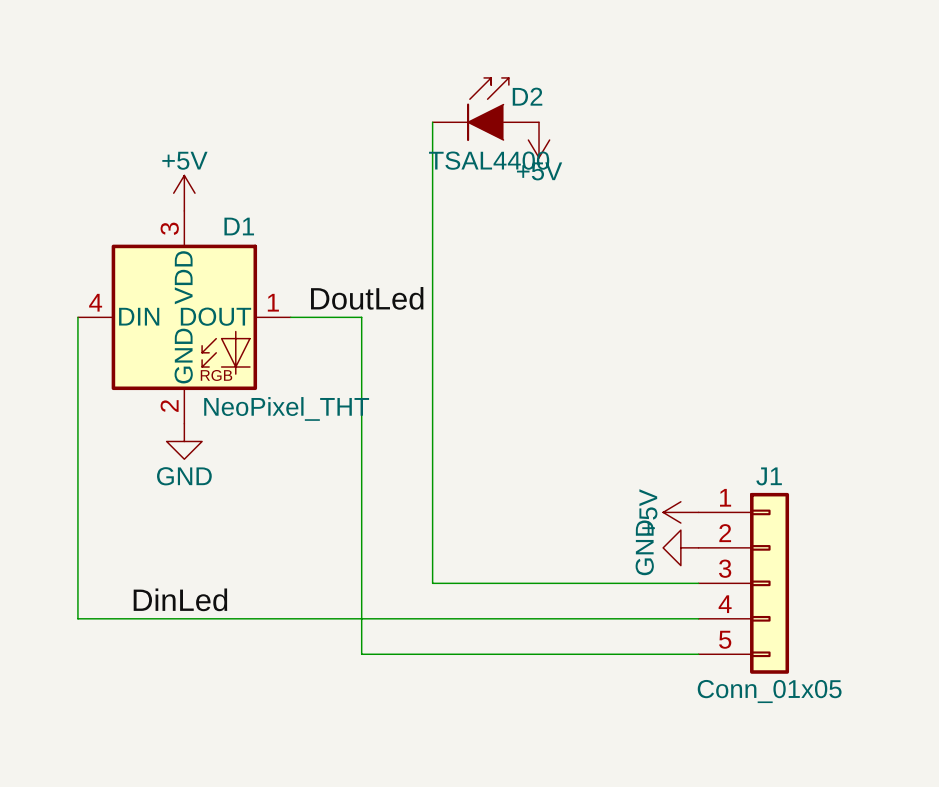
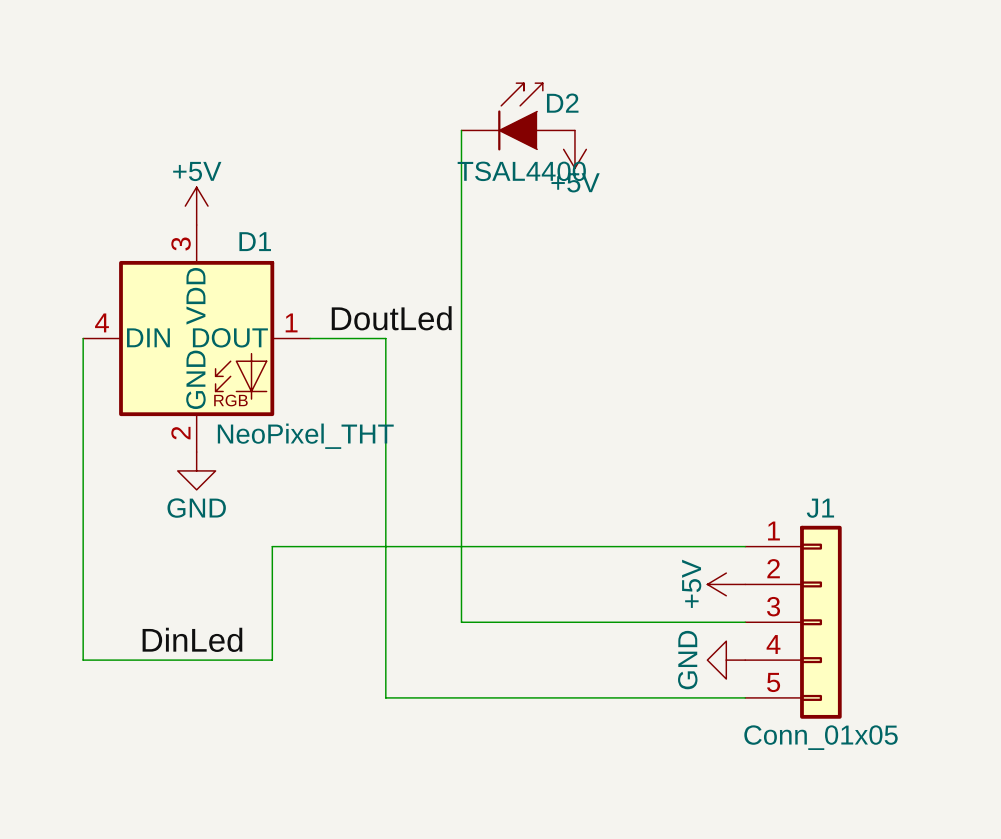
power symbol: +5V (680, 512) -> none
power symbol: GND (680, 547) -> +5V (726, 584)
wire: (255, 618) (698, 618) -> (272, 660) (272, 546) (745, 546)
power symbol: none -> GND (726, 660)

